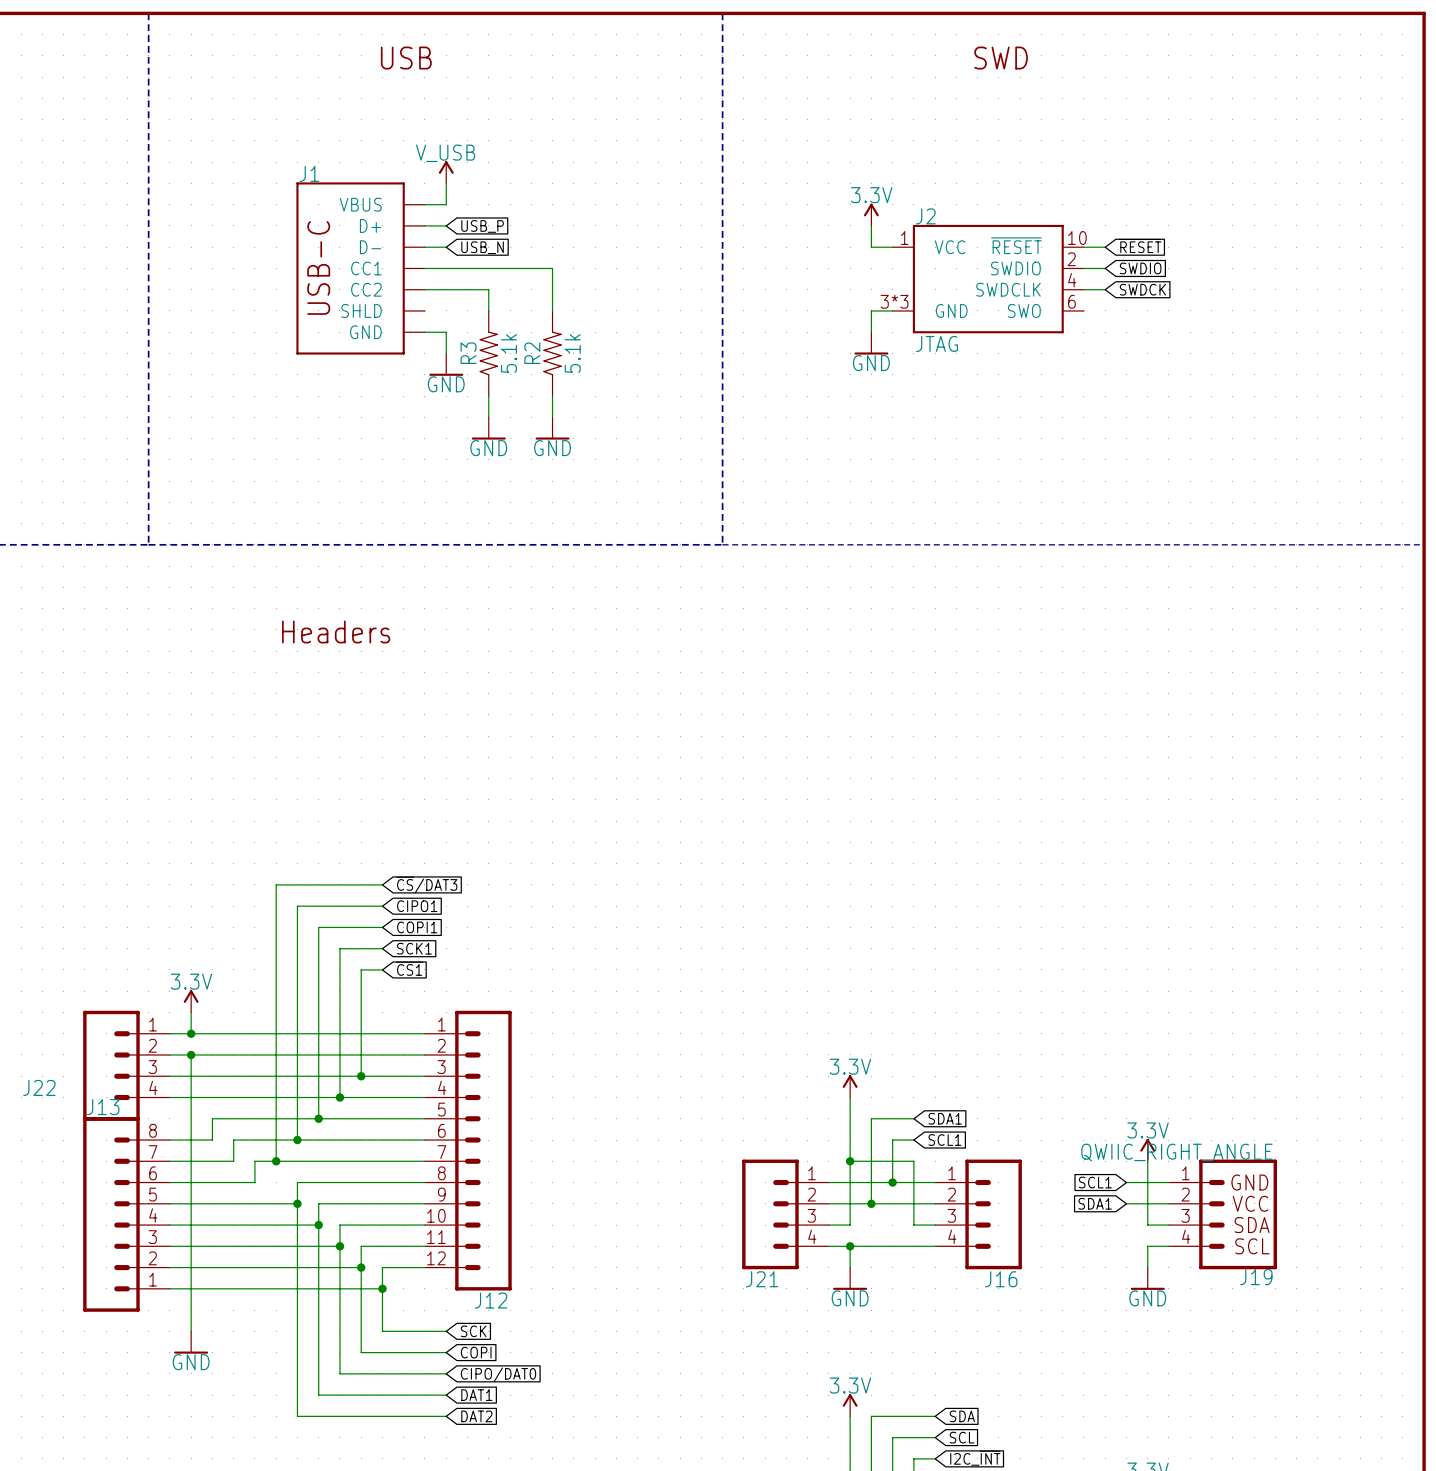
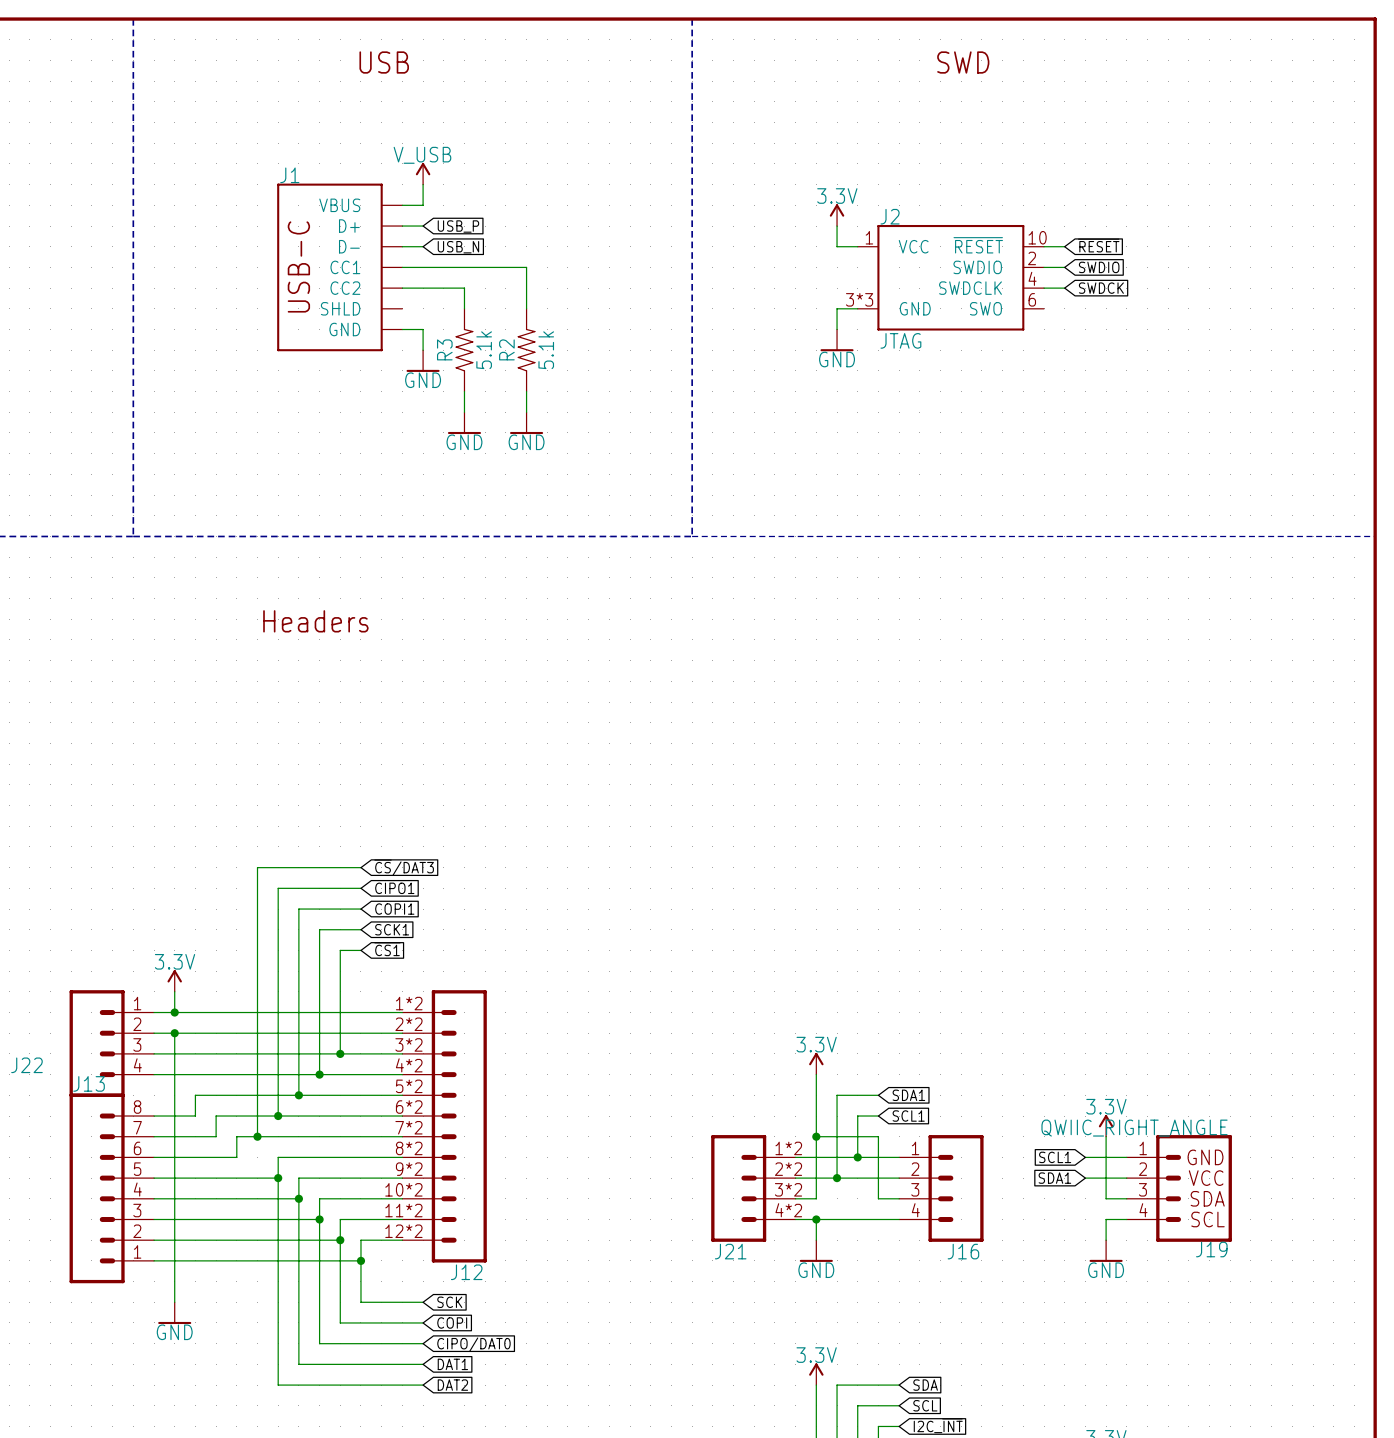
J12 symbol: [424, 1010, 512, 1291] -> [402, 990, 487, 1263]
J21 pin number: 1 (812, 1173) -> 1*2 (788, 1148)
J21 pin number: 2 (811, 1194) -> 2*2 (788, 1169)
J21 pin number: 3 (811, 1215) -> 3*2 (788, 1189)
J21 pin number: 4 (812, 1236) -> 4*2 (788, 1210)

